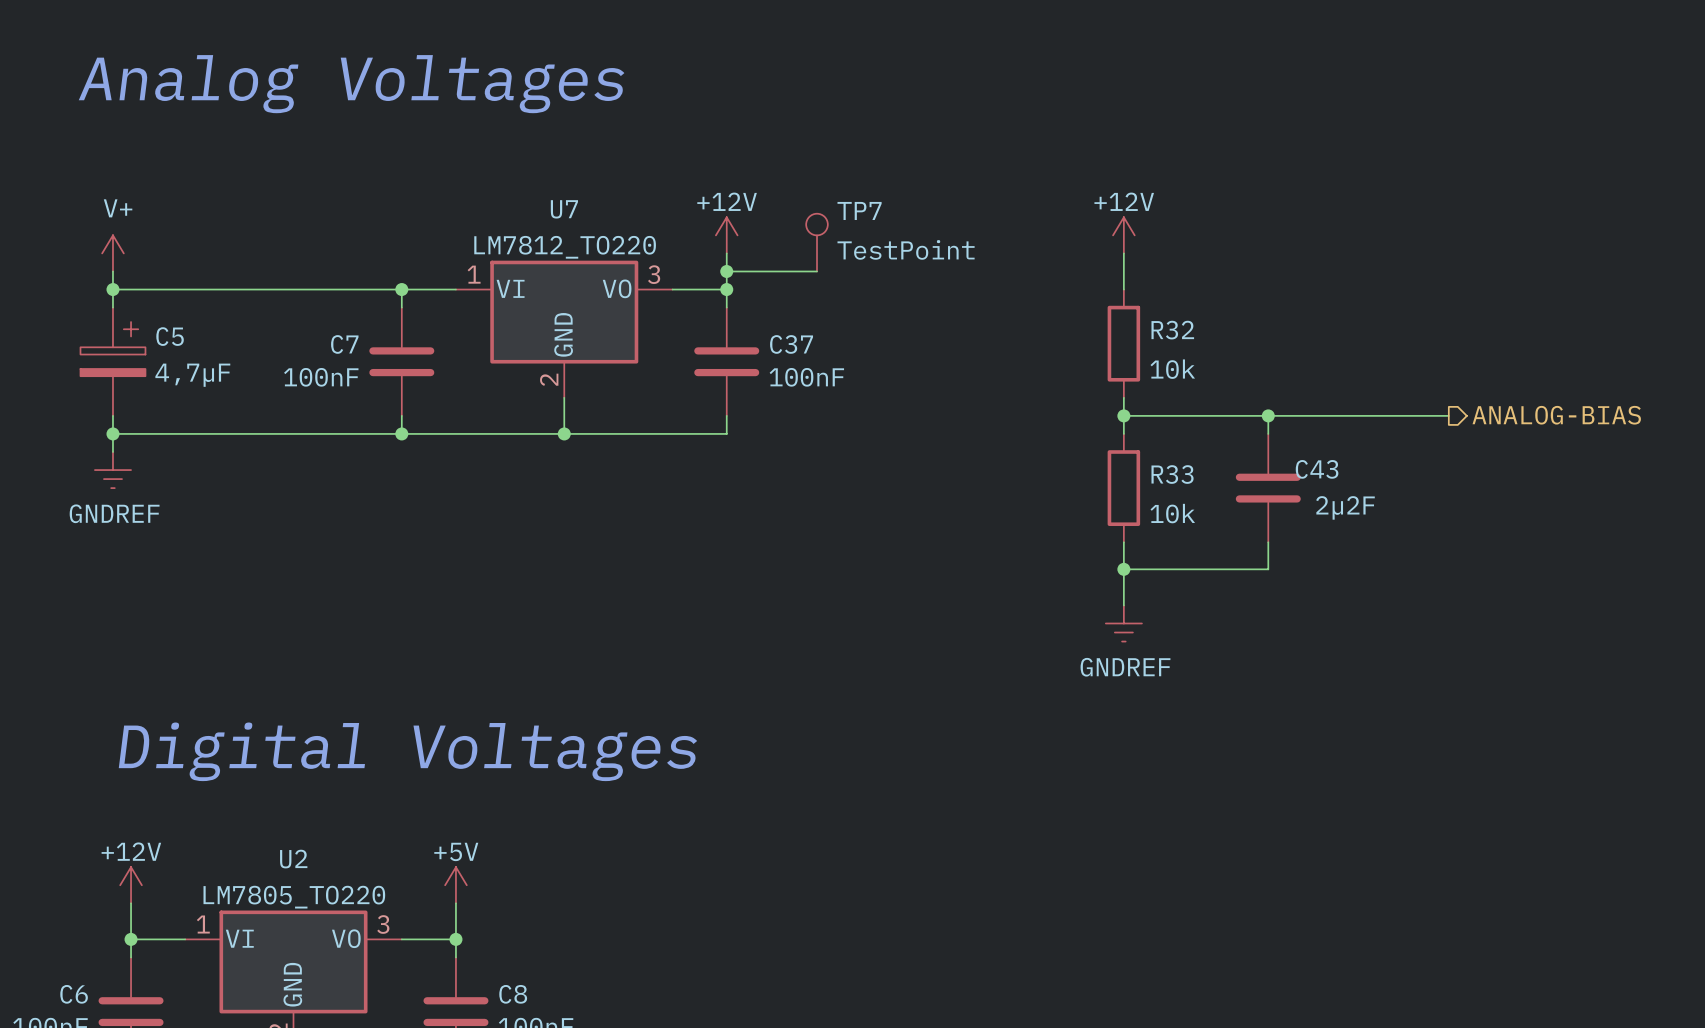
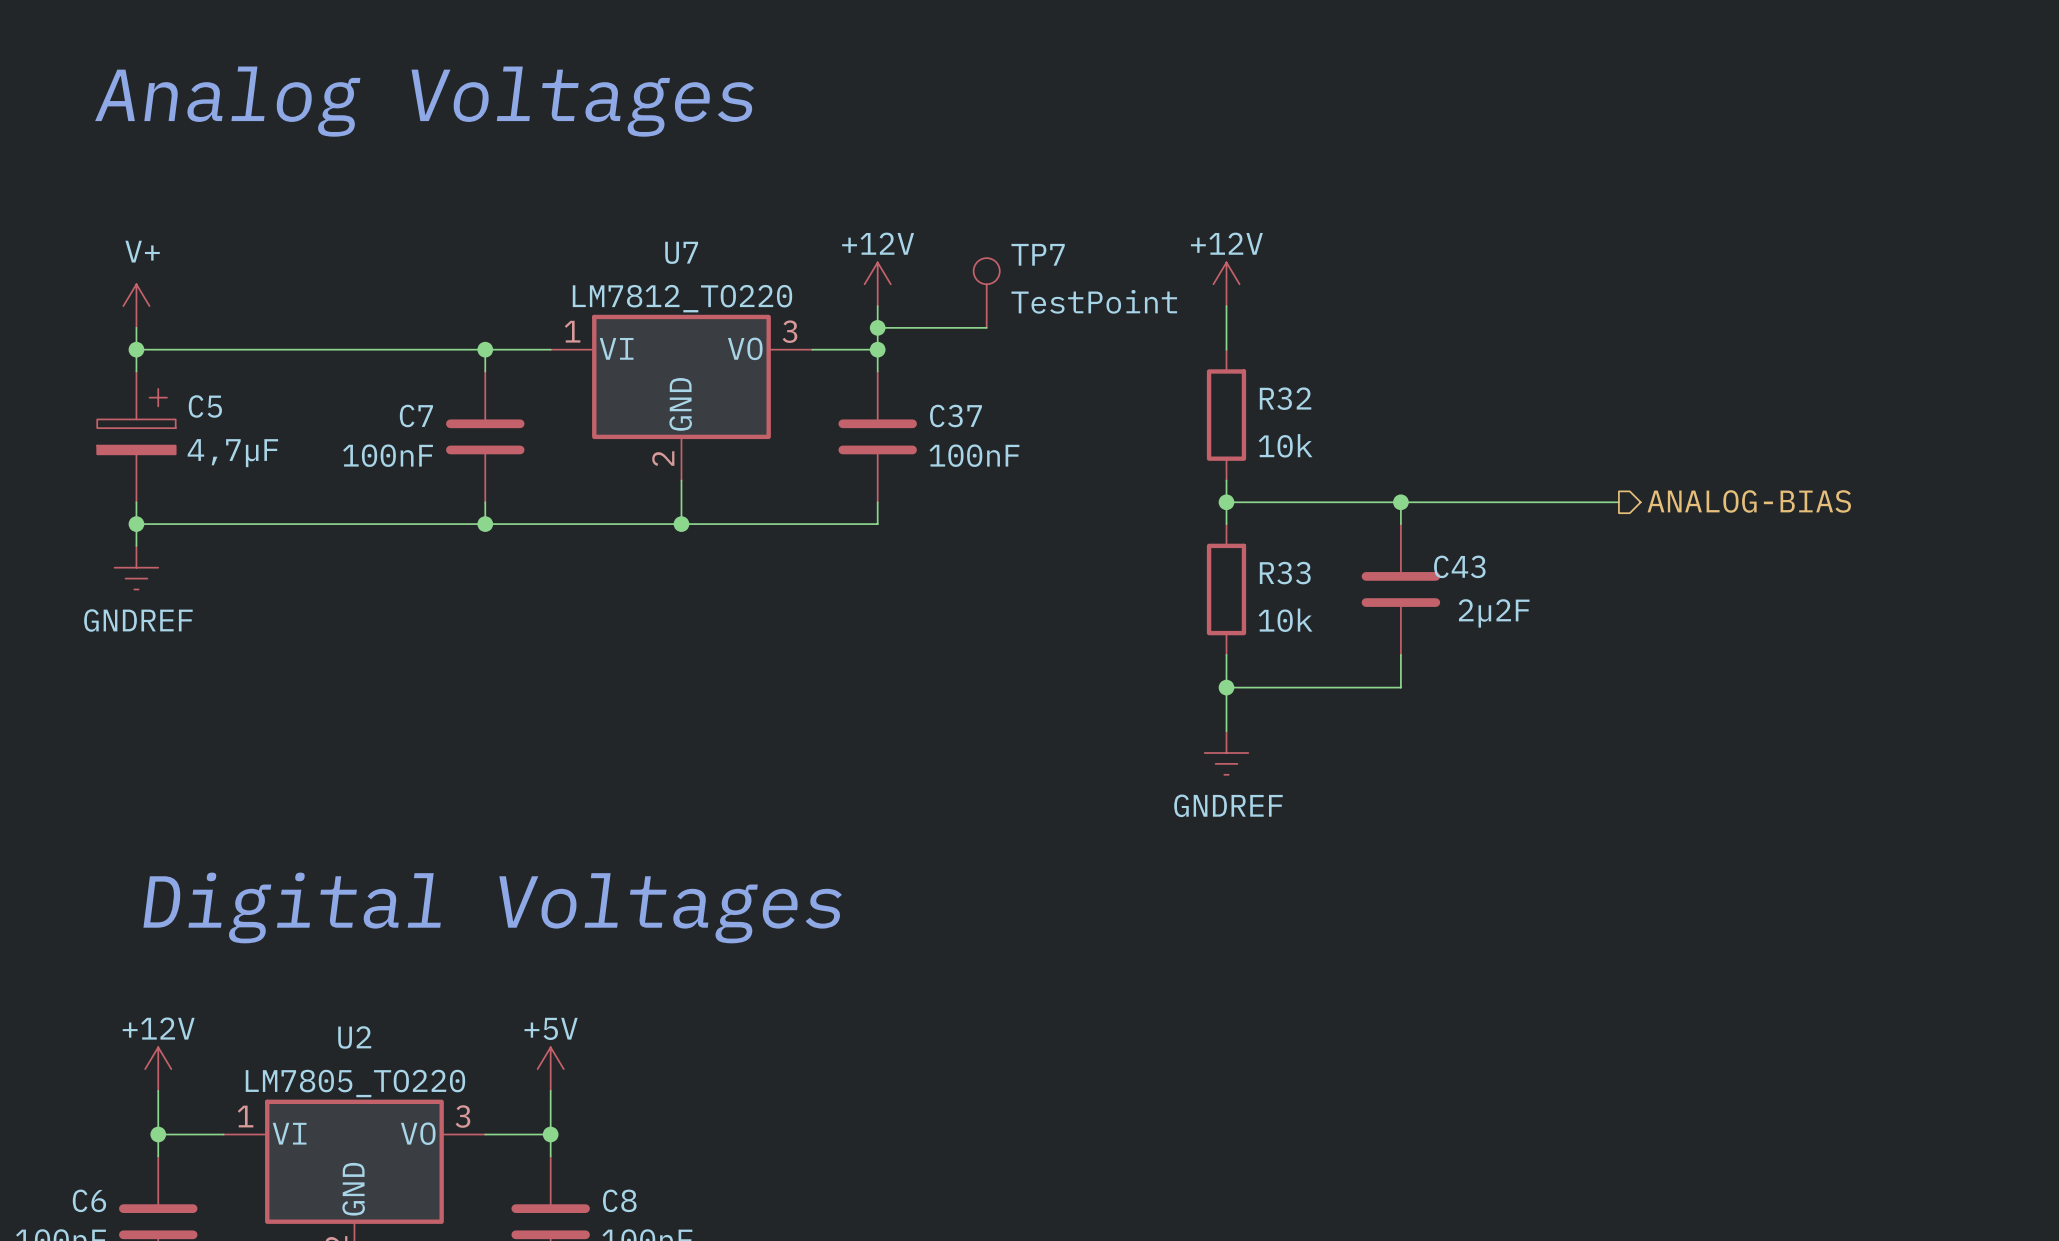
power symbol position: +12V (1123, 235) -> +12V (1226, 284)
wire: (1123, 253) (1123, 289) -> (1226, 306) (1226, 349)
R32 position: (1123, 343) -> (1226, 415)
wire: (1123, 397) (1123, 433) -> (1226, 480) (1226, 524)
junction: none -> (1226, 502)
junction position: (1123, 415) -> (1400, 502)
wire: (1268, 415) (1268, 433) -> (1400, 502) (1400, 524)
junction: (1268, 415) -> none
wire: (1340, 415) (1448, 415) -> (1226, 502) (1357, 502)
hierarchical label position: ANALOG-BIAS (1556, 415) -> ANALOG-BIAS (1749, 501)
R33 position: (1123, 488) -> (1226, 589)
C43 position: (1268, 488) -> (1400, 589)
wire: (1123, 542) (1123, 605) -> (1226, 654) (1226, 731)
wire: (1268, 542) (1268, 569) (1159, 569) -> (1400, 654) (1400, 687)
wire: none -> (1226, 687) (1357, 687)
junction: none -> (1226, 687)
junction: (1123, 569) -> none
power symbol position: GNDREF (1123, 623) -> GNDREF (1226, 752)

